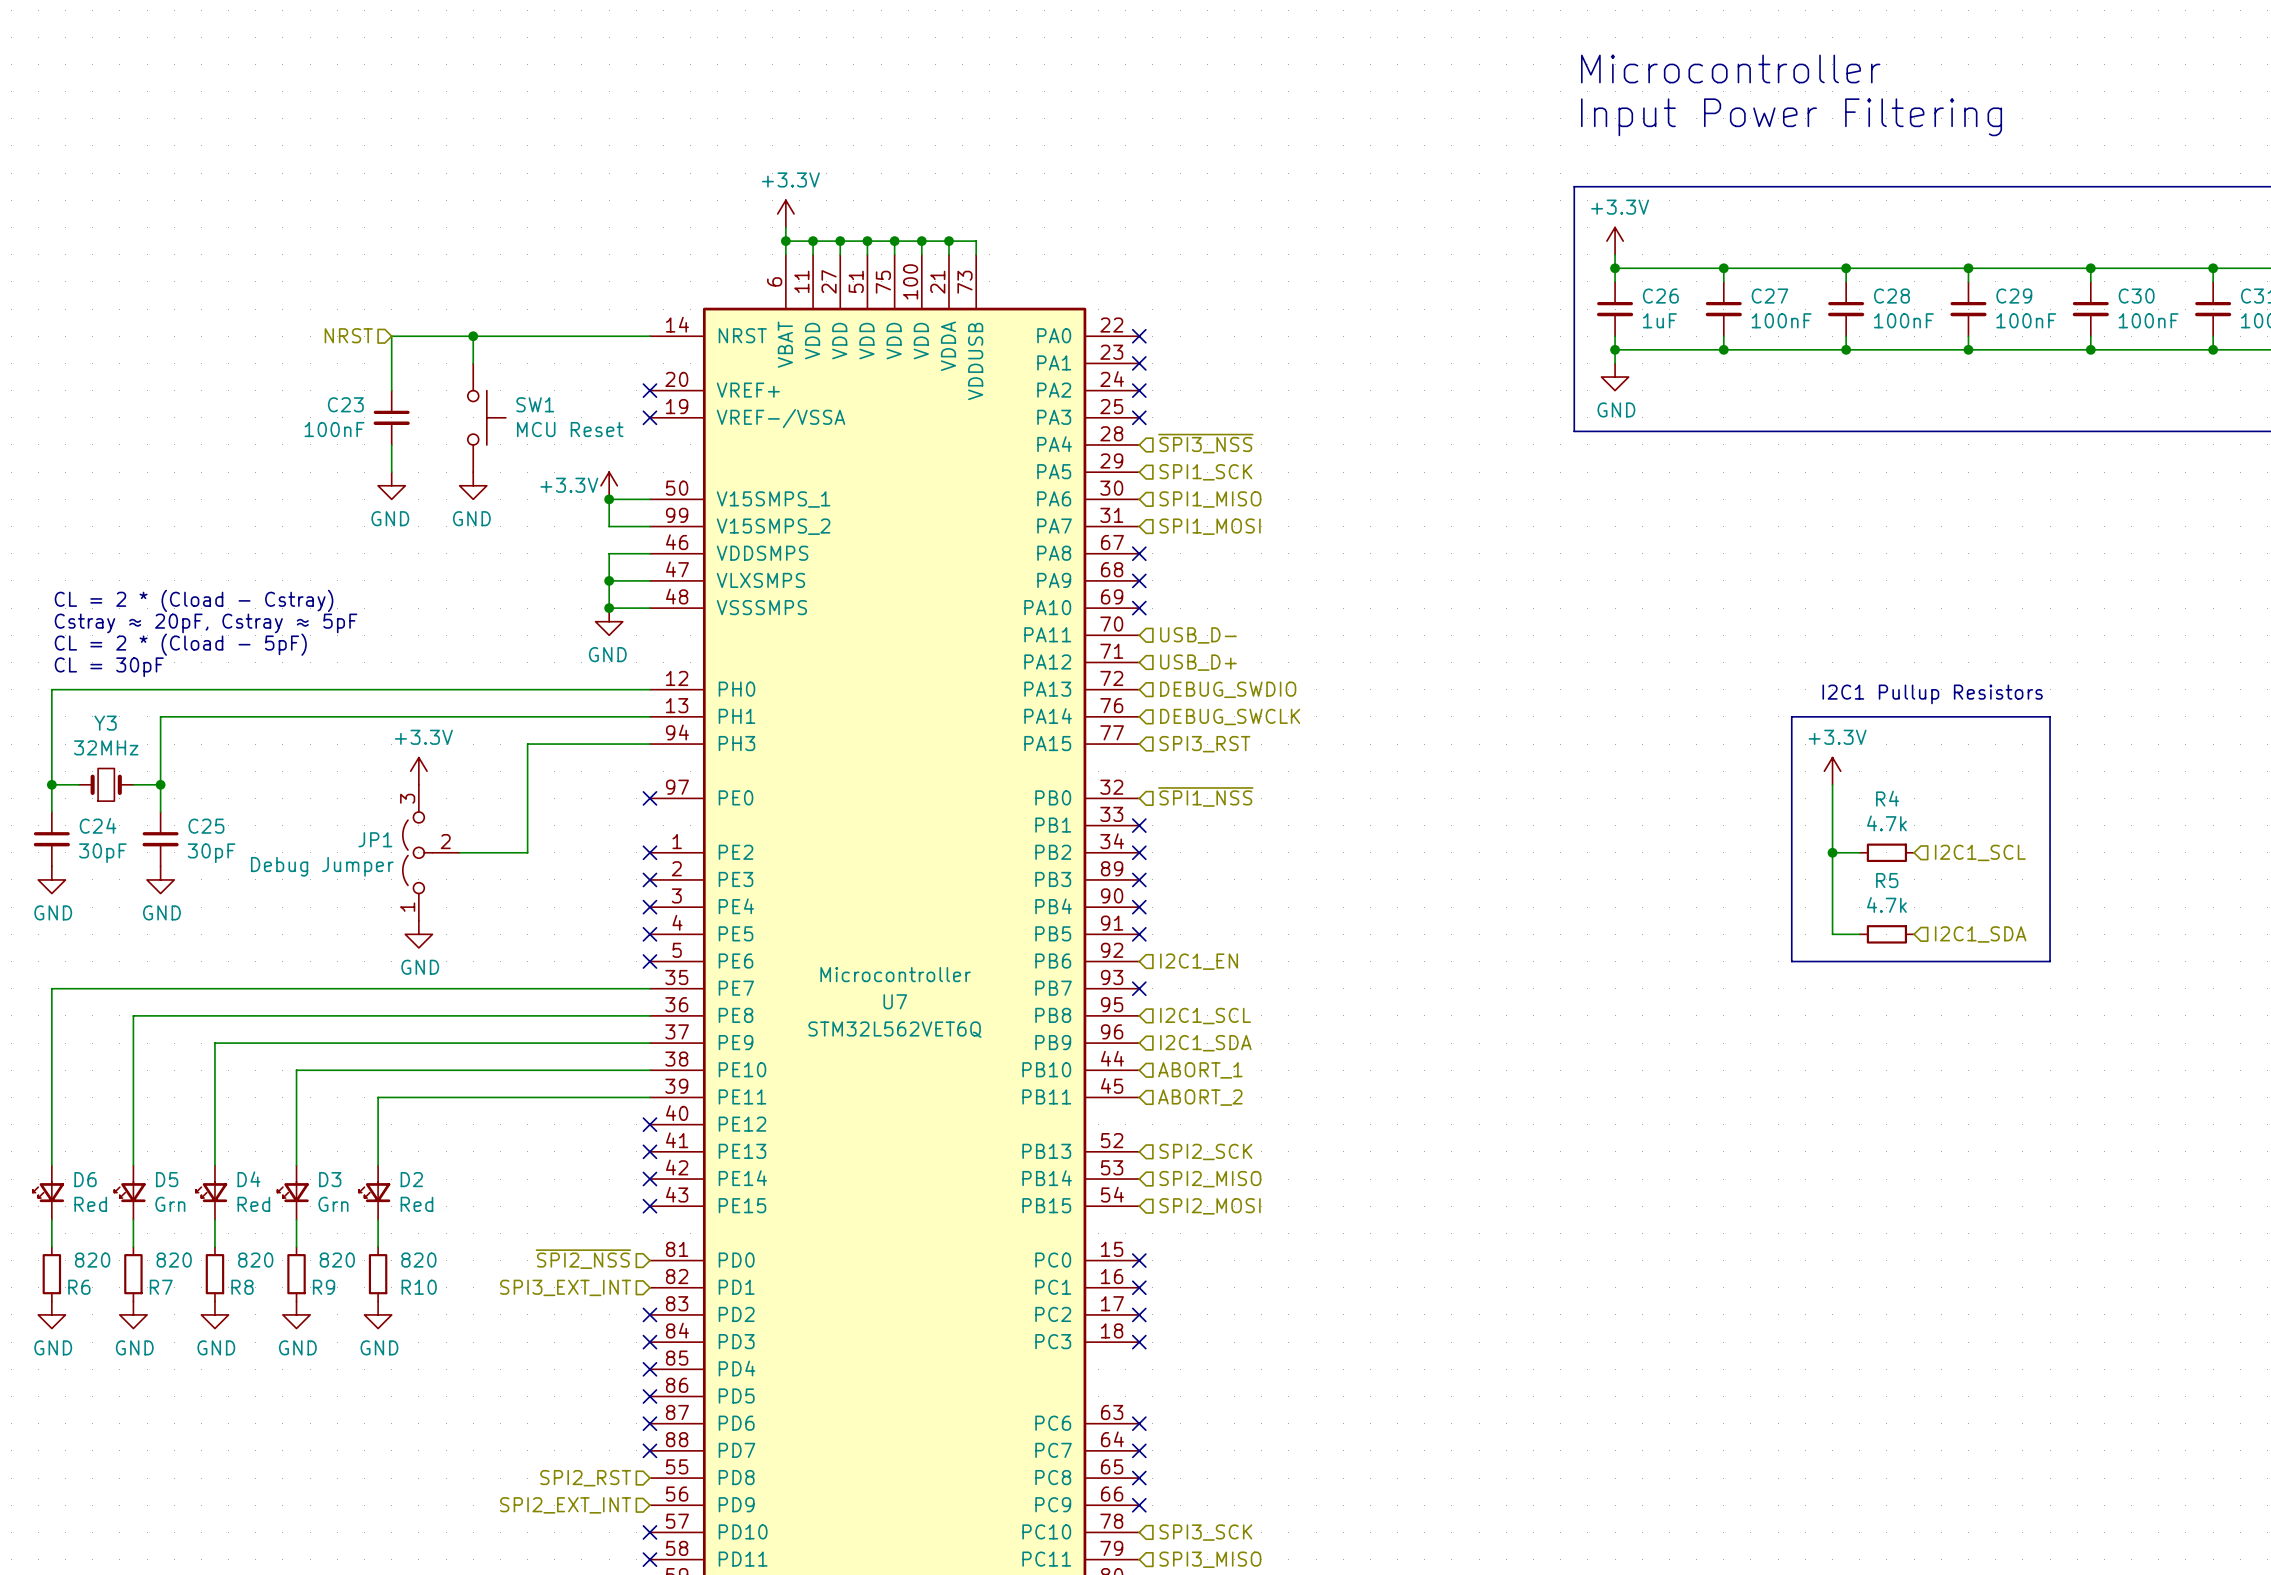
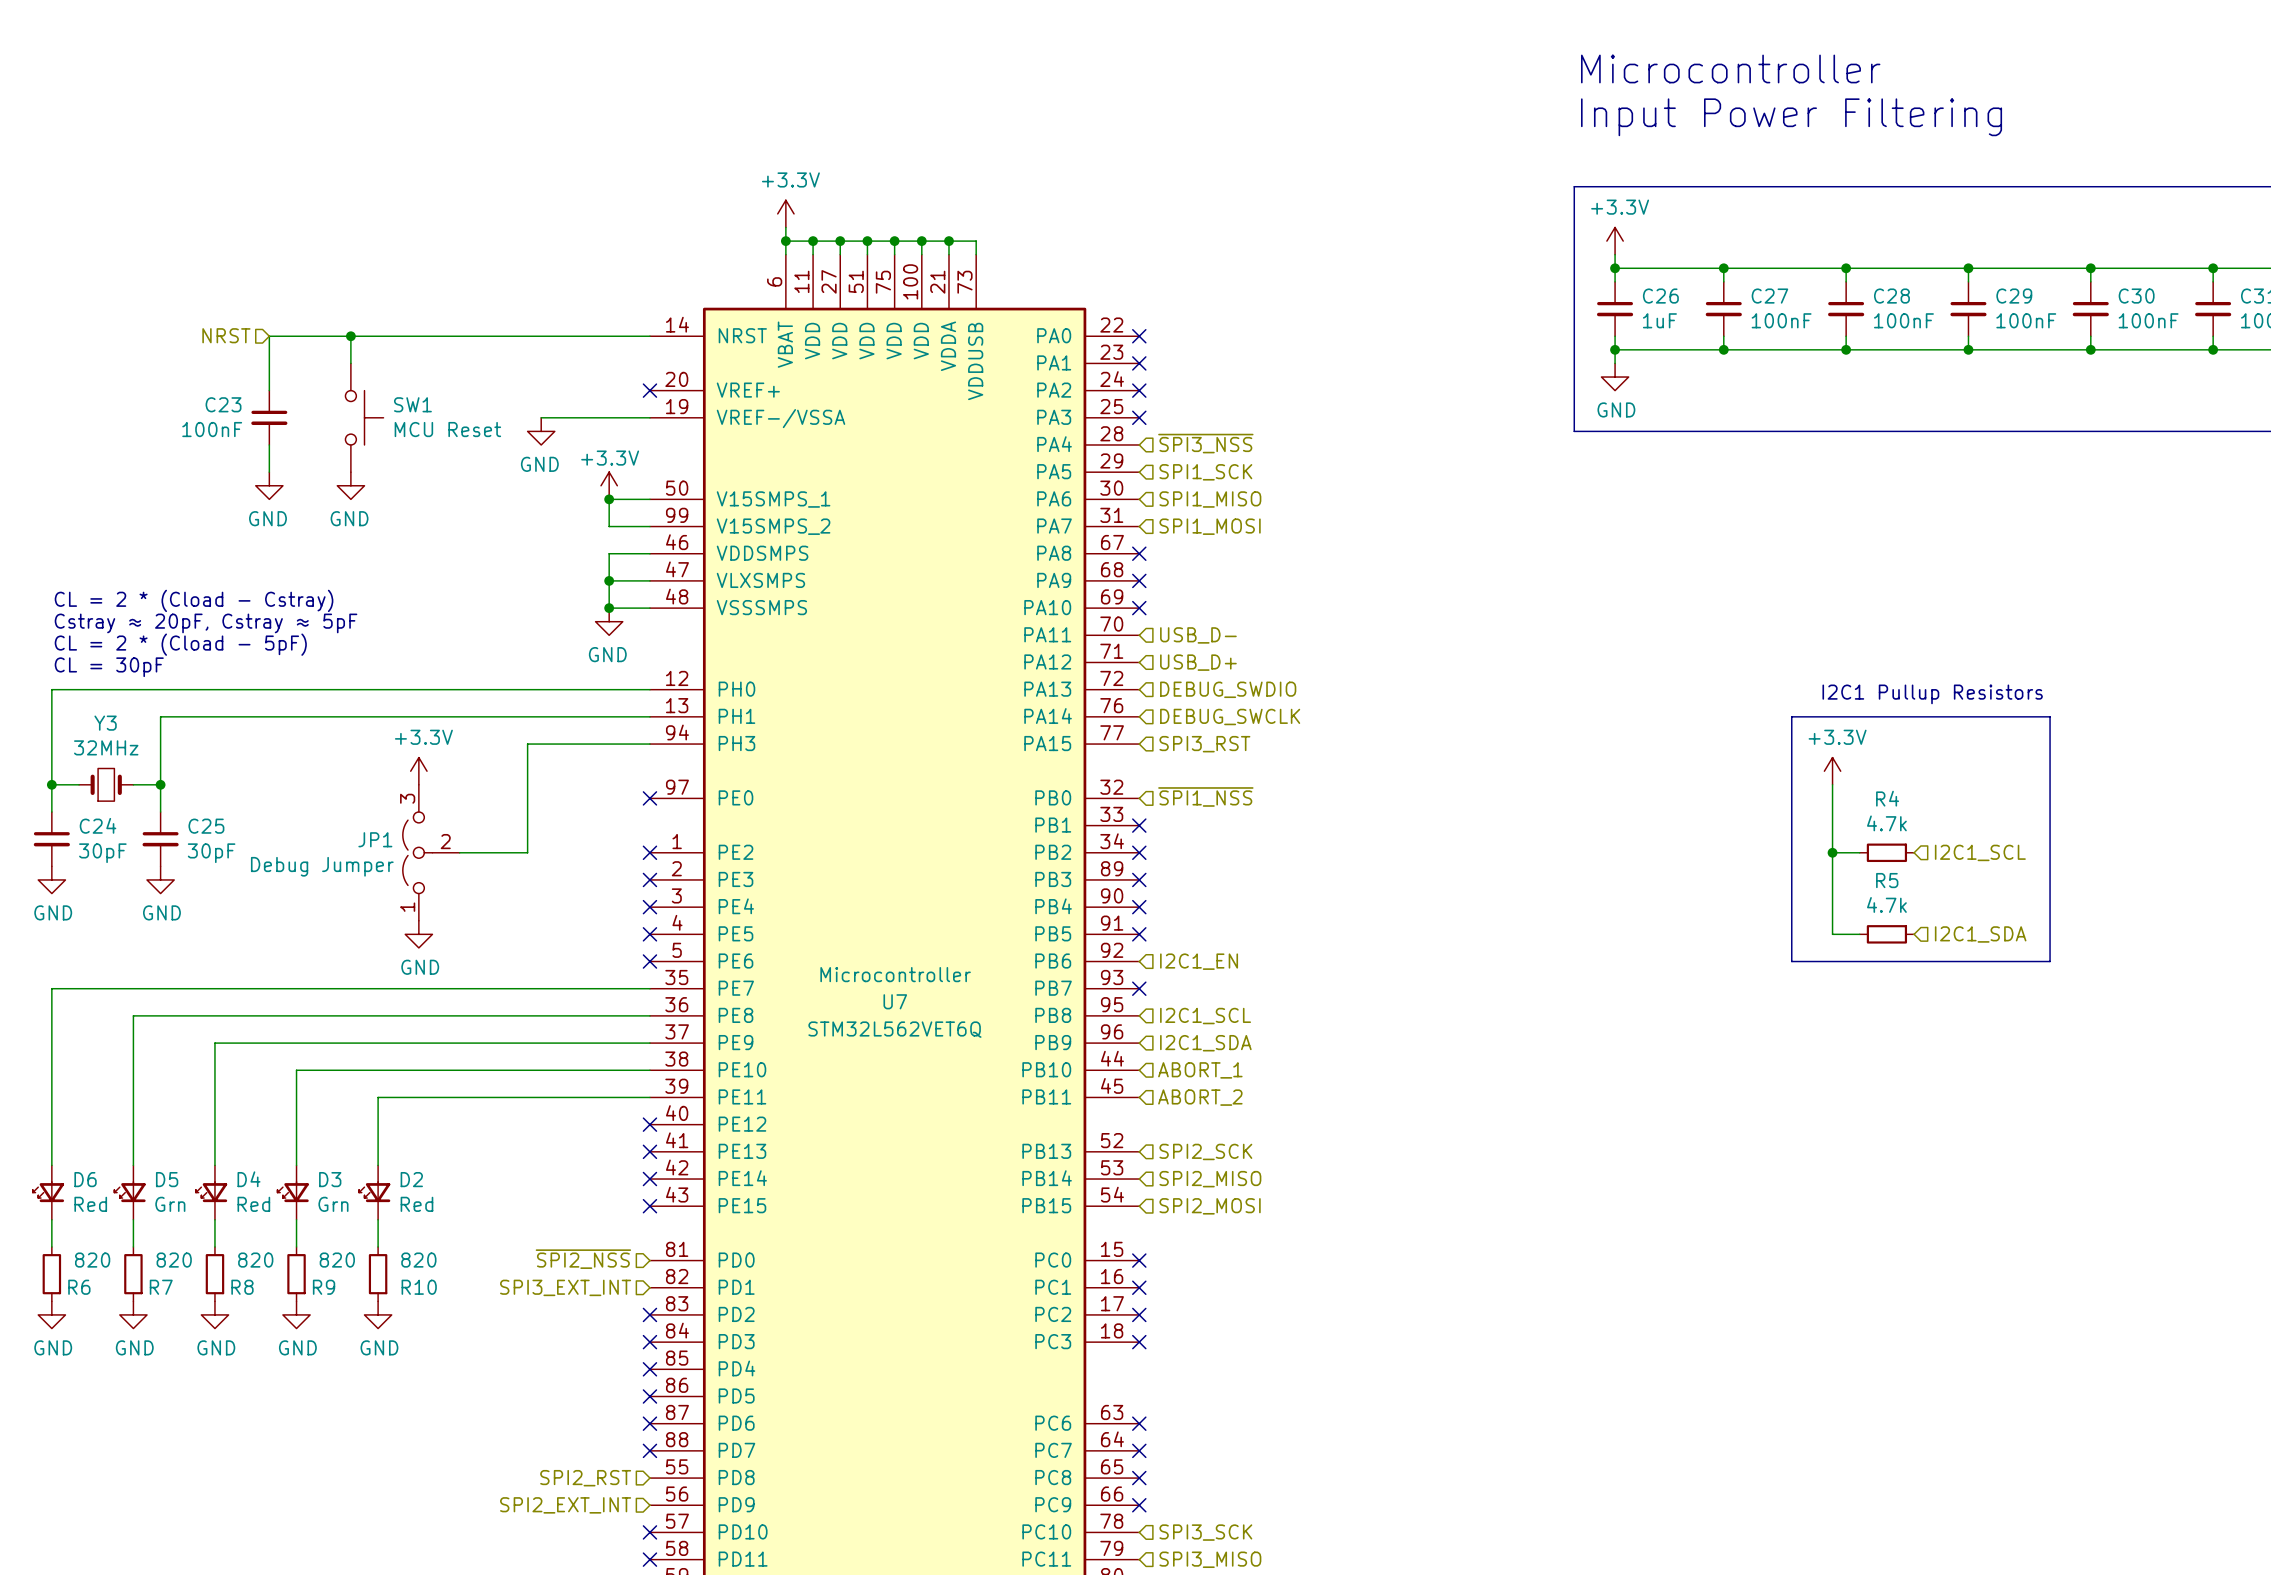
hierarchical label position: NRST (348, 335) -> NRST (226, 335)
junction: none -> (350, 336)
wire: (391, 336) (391, 390) -> (391, 336) (269, 336) (269, 390)
wire: (473, 336) (473, 363) -> (350, 336) (350, 363)
junction: (473, 336) -> none
C23 position: (391, 417) -> (269, 417)
SW1 position: (486, 417) -> (364, 417)
wire: none -> (541, 417) (649, 417)
no-connect mark: (649, 417) -> none
power symbol: none -> GND (541, 431)
wire: (391, 444) (391, 472) -> (269, 444) (269, 472)
power symbol: none -> GND (269, 485)
power symbol position: GND (391, 485) -> GND (350, 485)
power symbol: GND (473, 485) -> none
power symbol text position: +3.3V (569, 485) -> +3.3V (610, 458)

